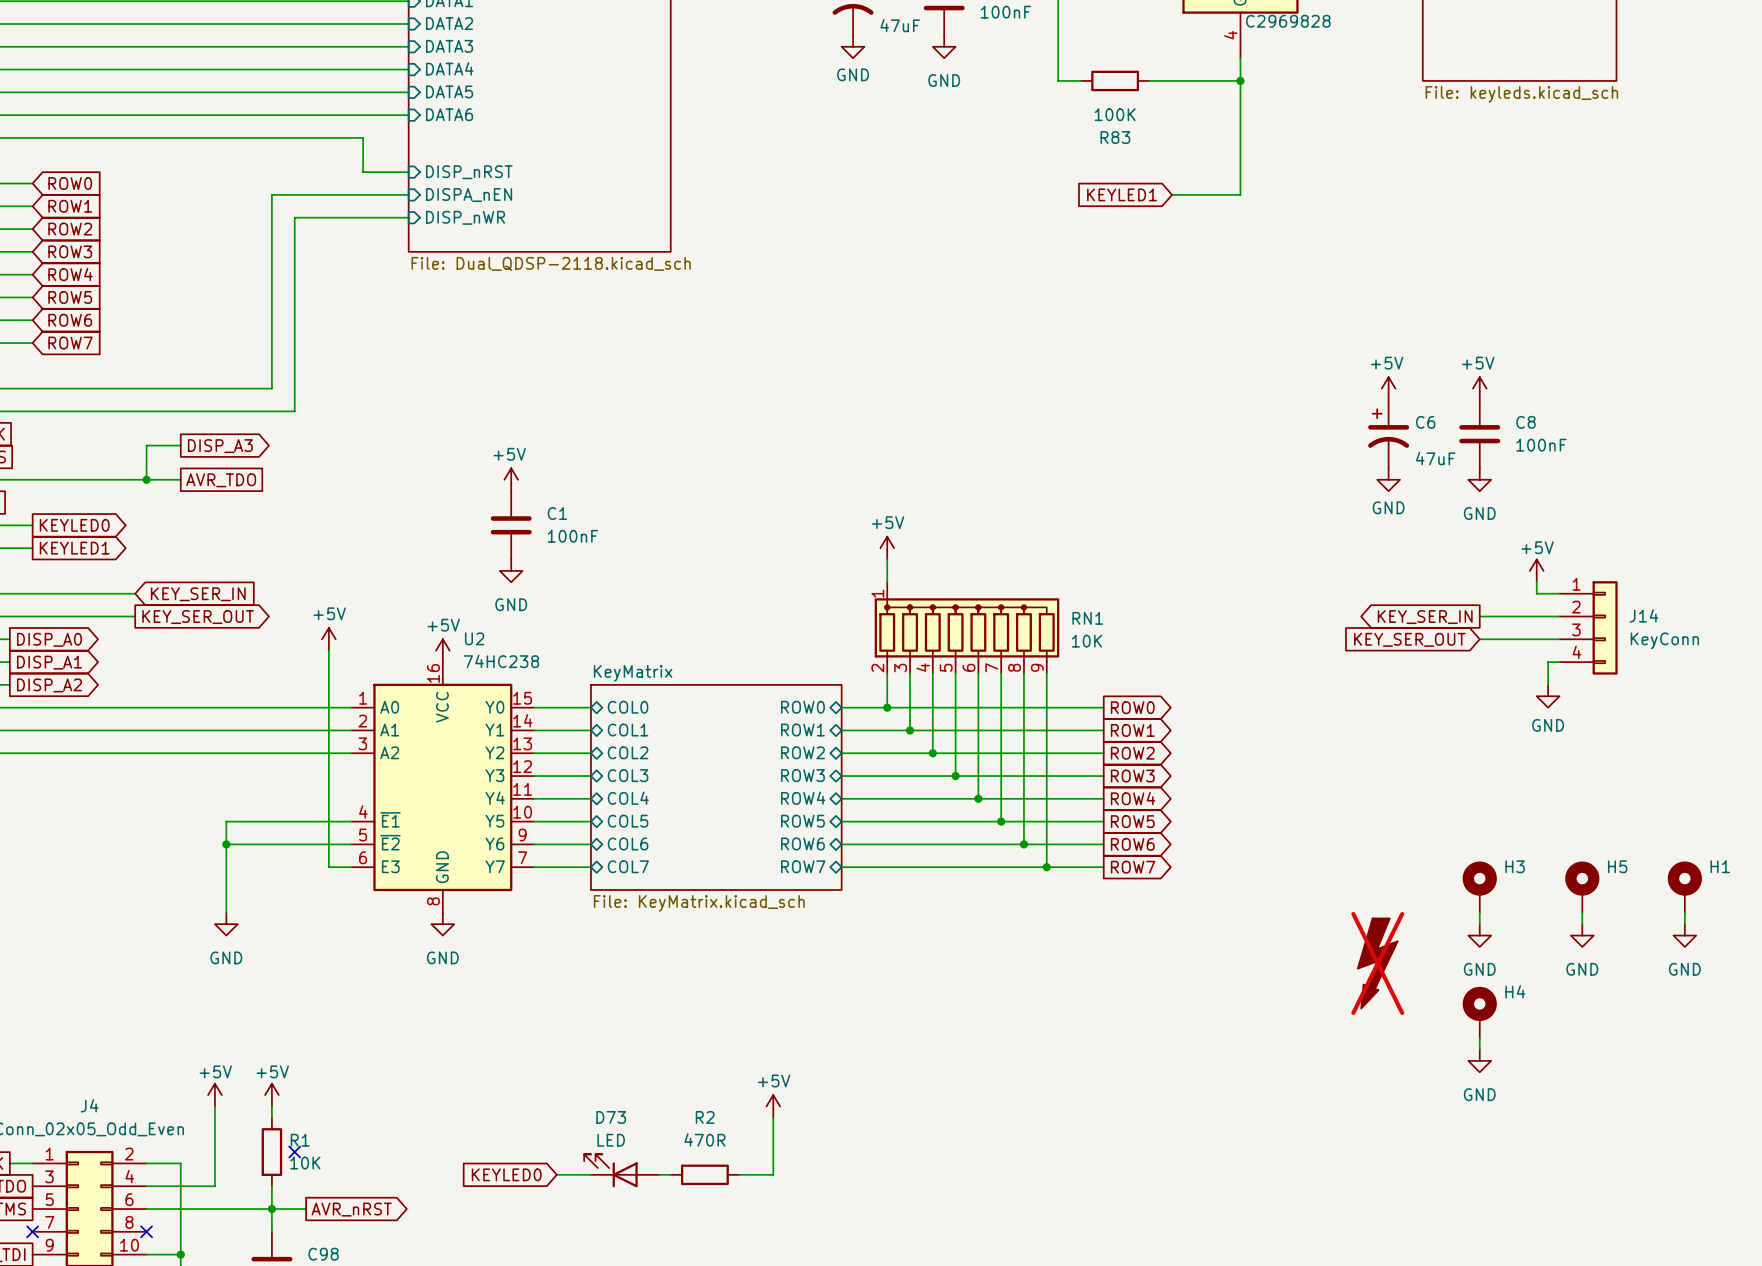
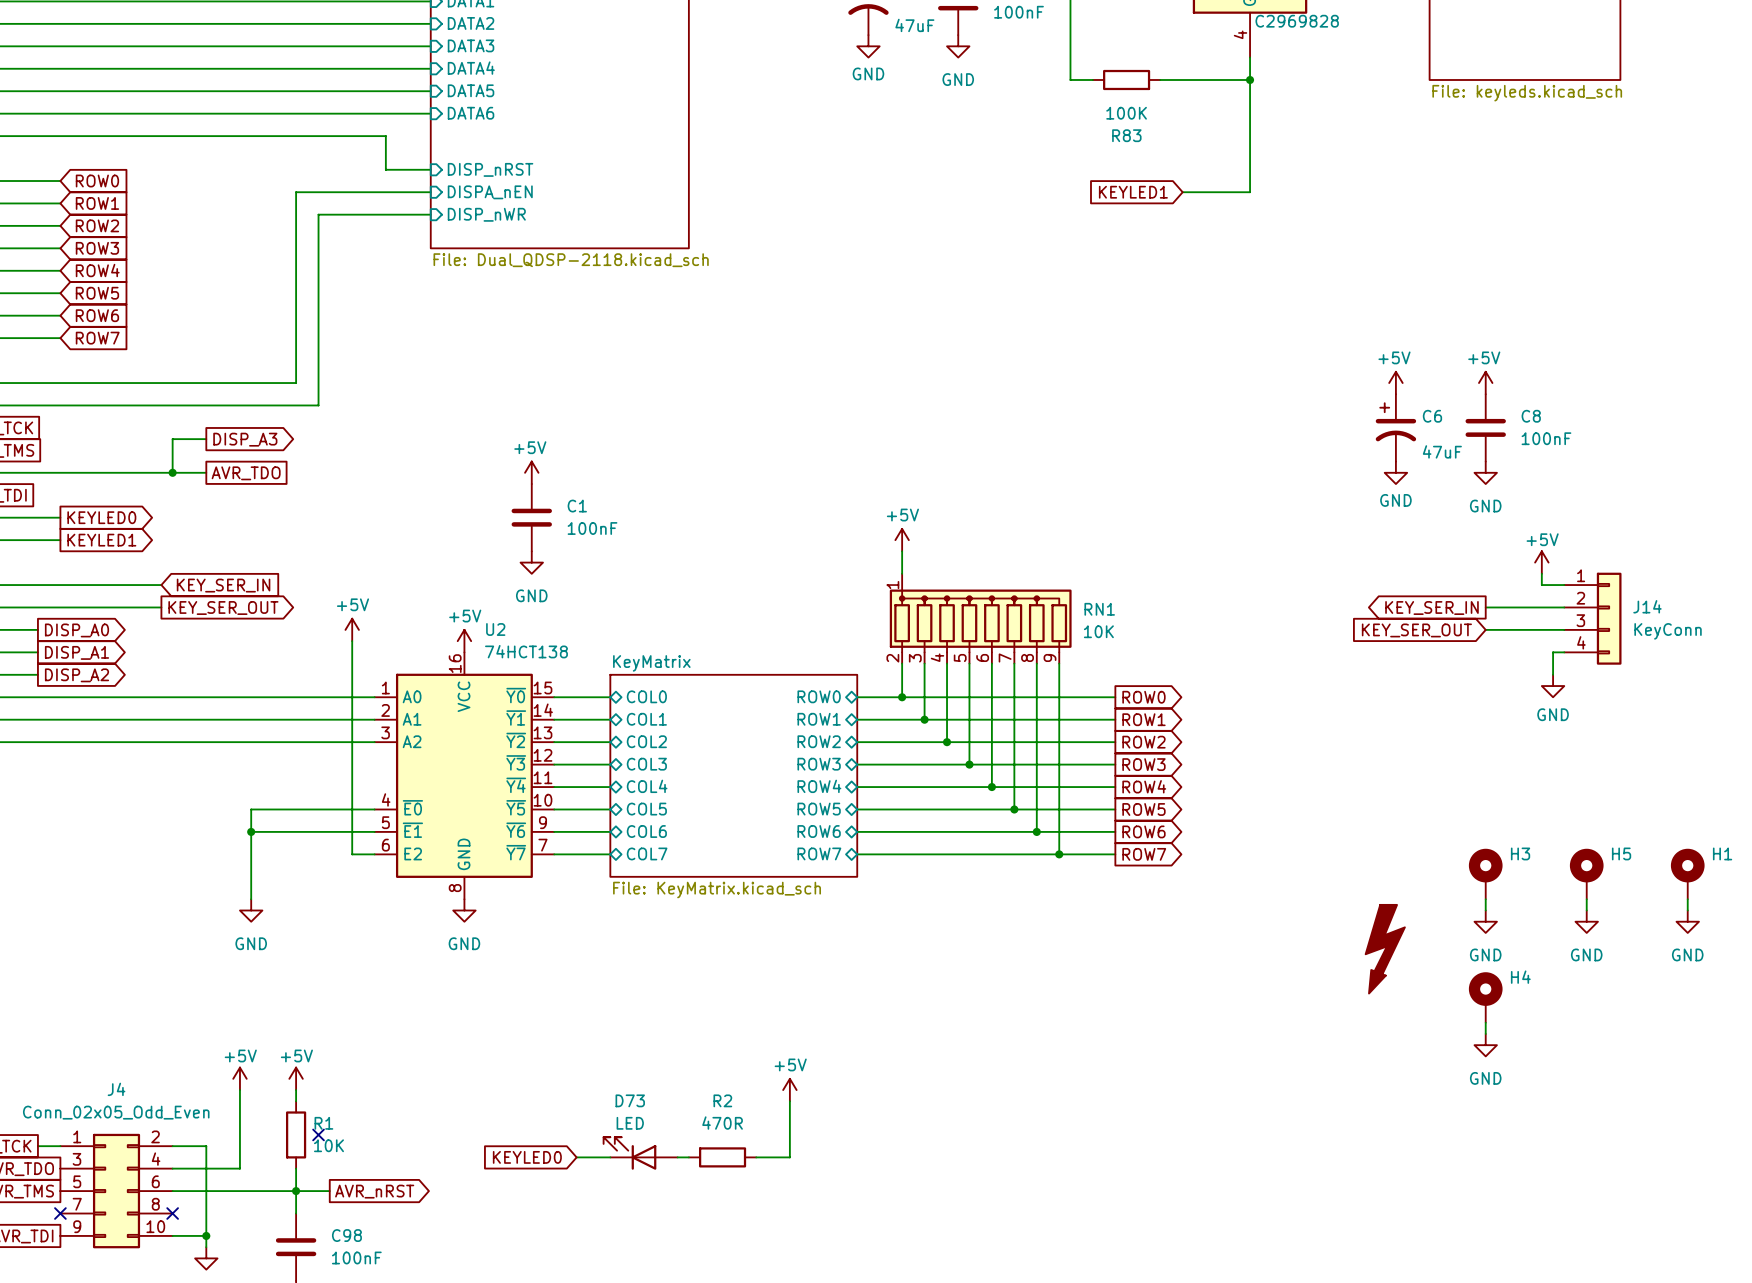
U2 value: 74HC238 (501, 661) -> 74HCT138 (526, 651)
U2 symbol: [351, 662, 535, 913] -> [374, 652, 555, 900]
part do-not-place cross: (1377, 963) -> none

